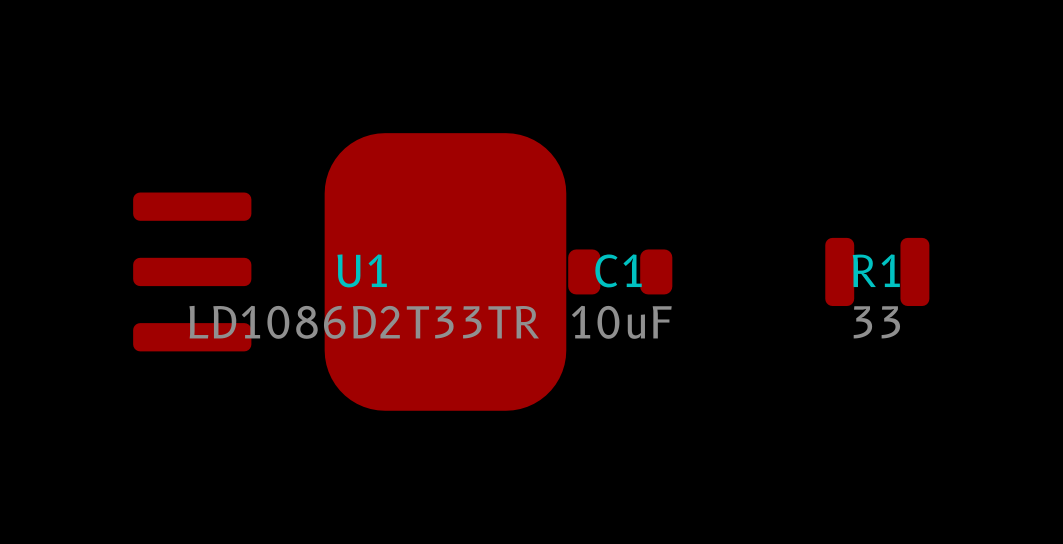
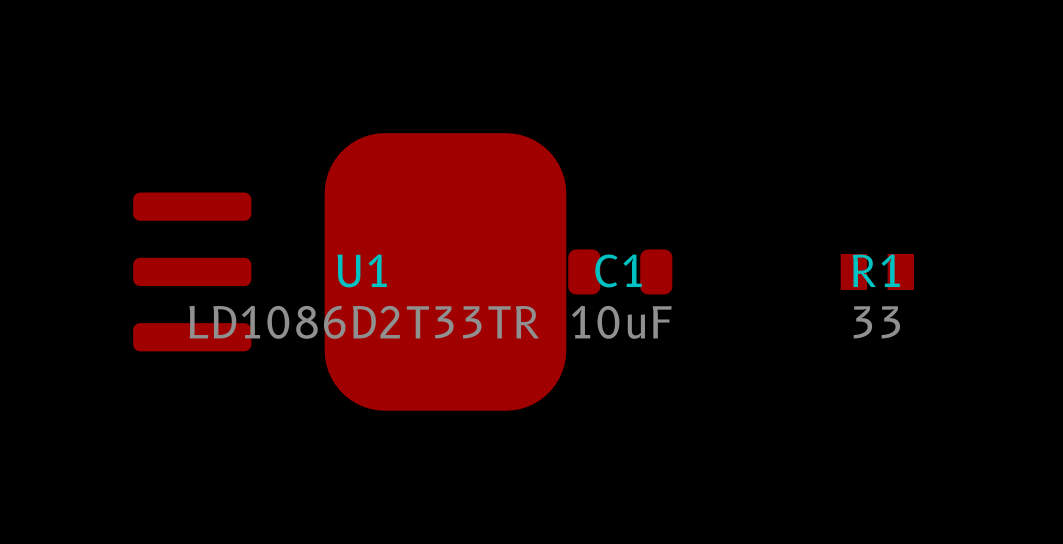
R1 footprint: [825, 237, 930, 307] -> [840, 253, 914, 290]

